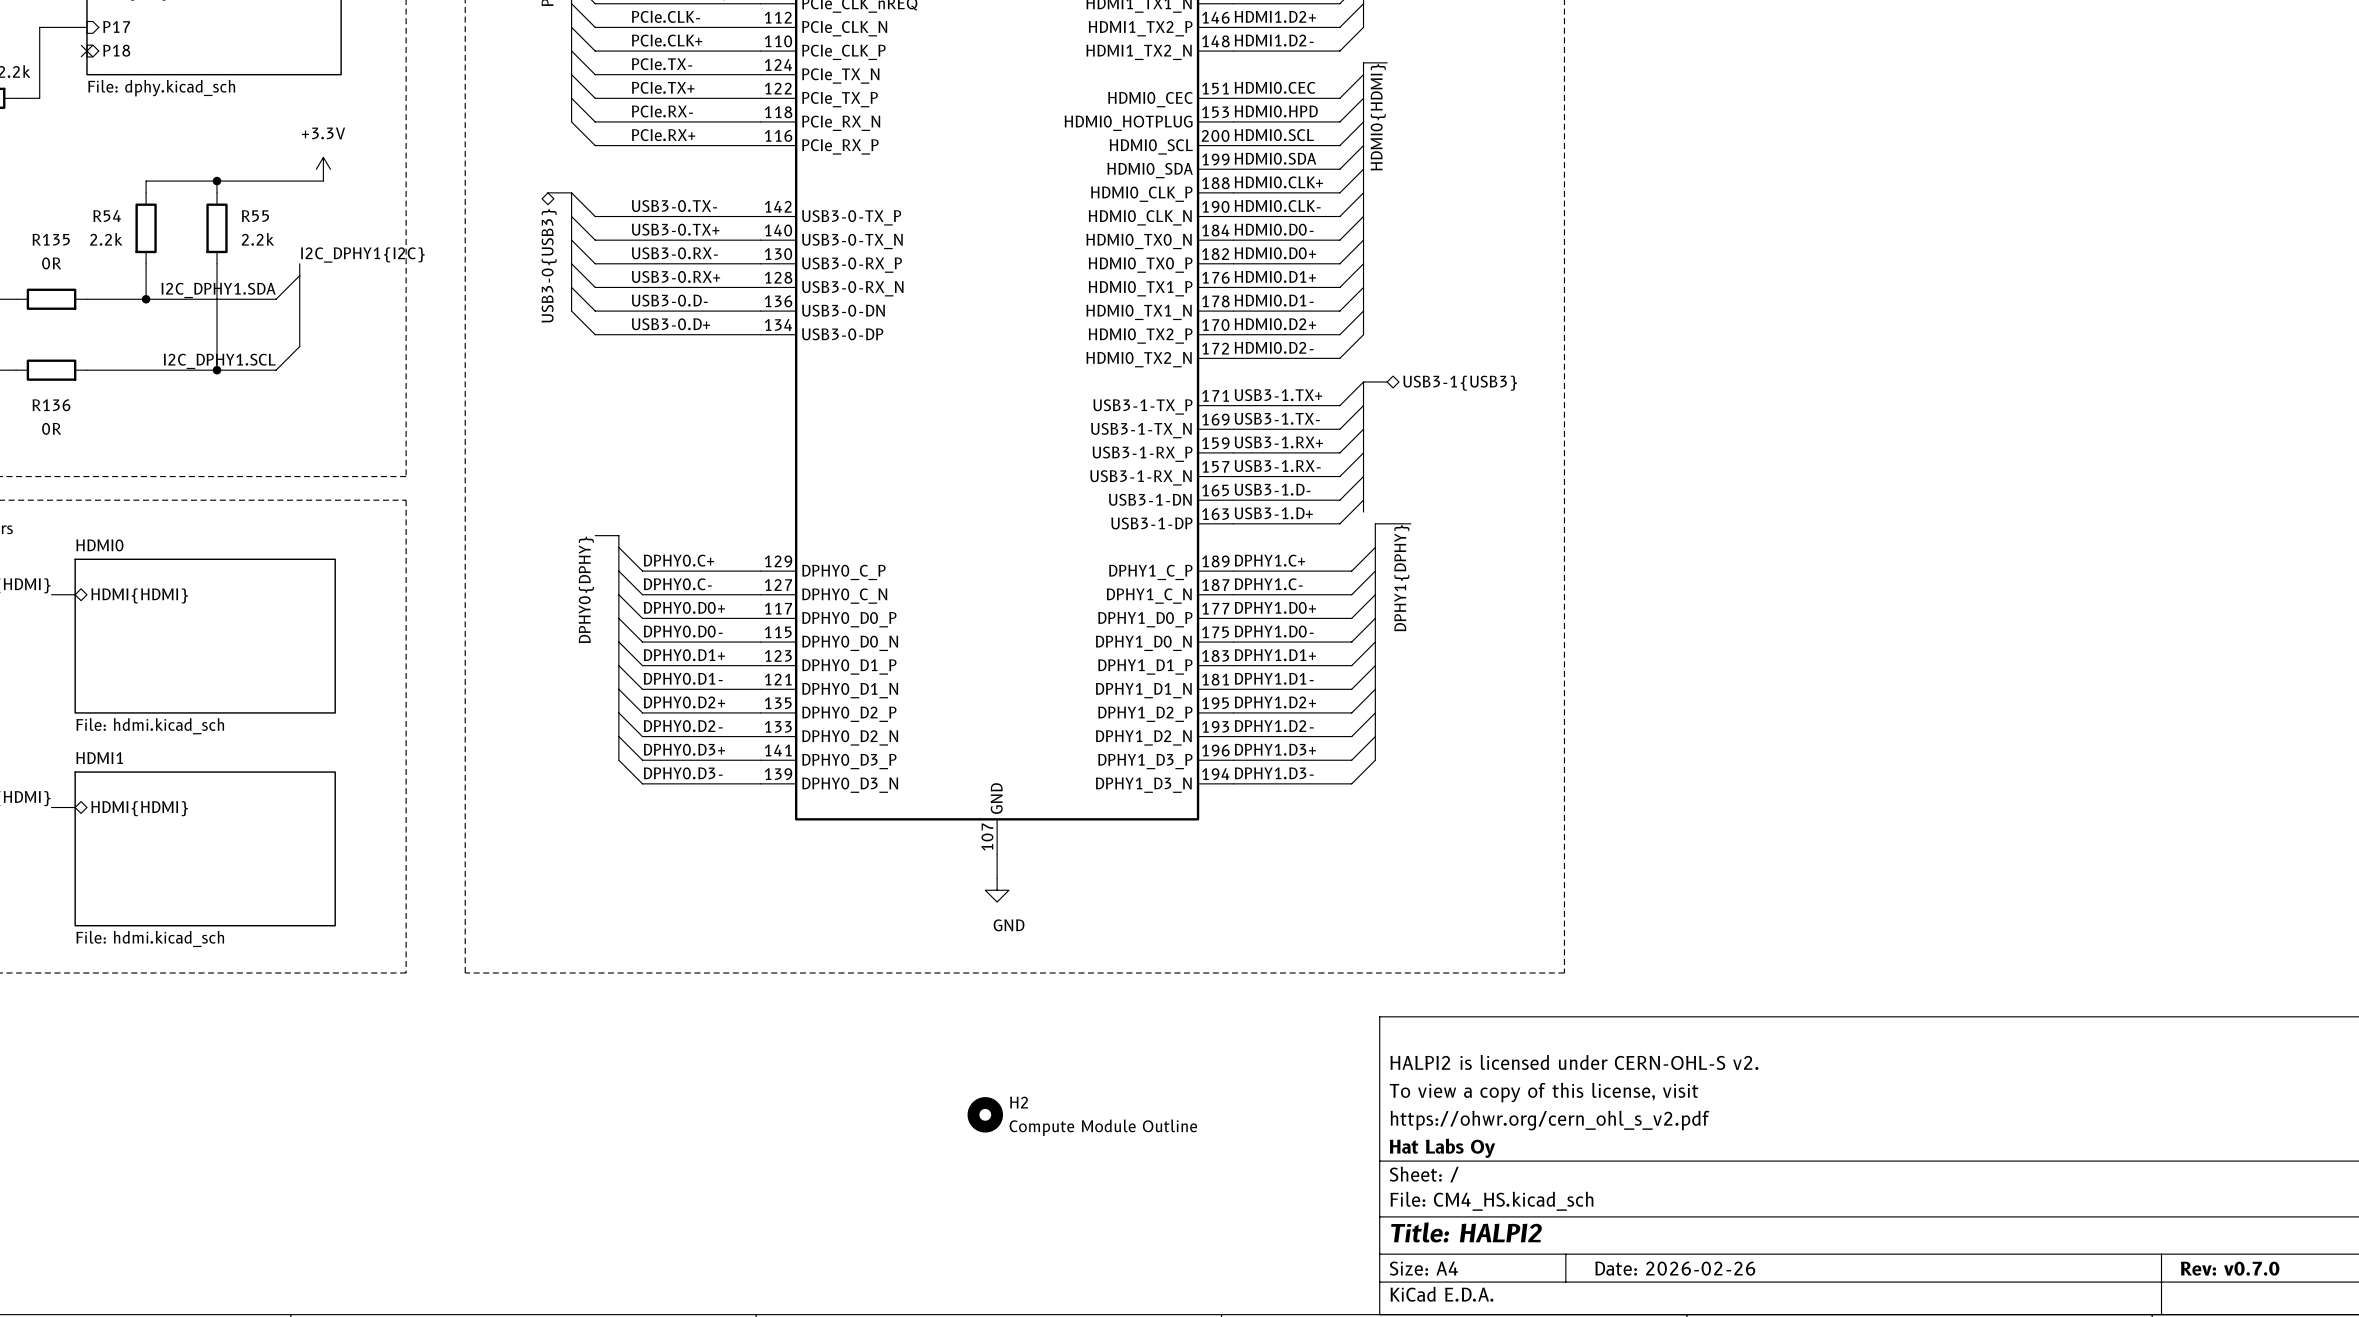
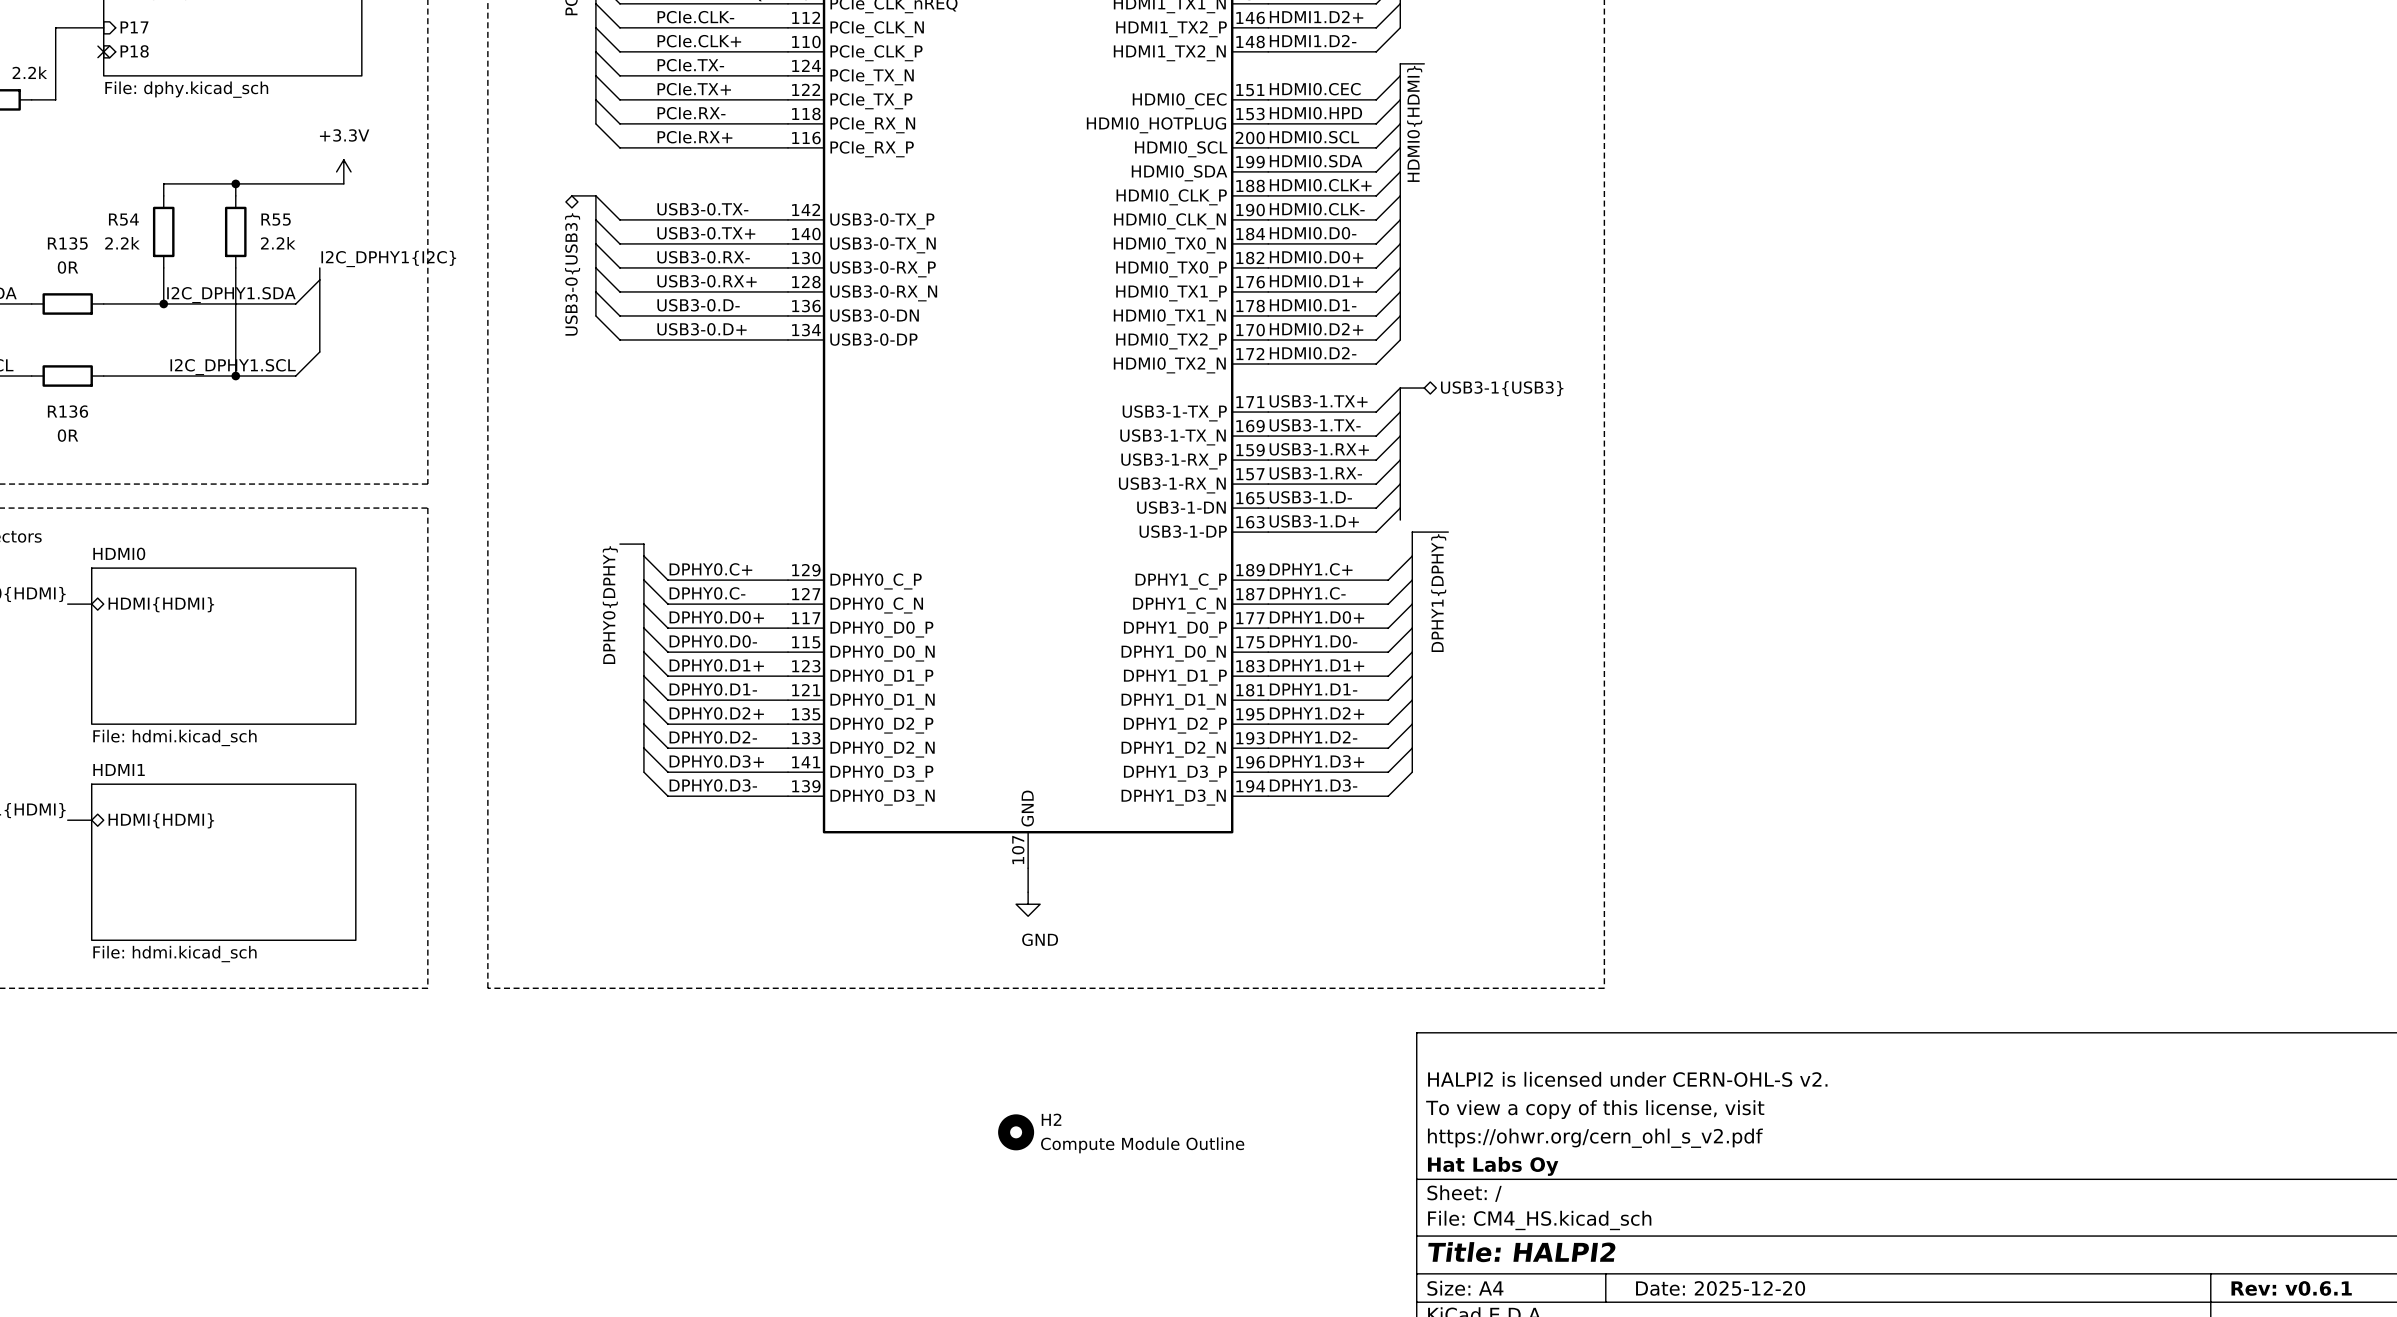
title block: Date: 2026-02-26 (1675, 1268) -> Date: 2025-12-20 (1720, 1288)
title block: Rev: v0.7.0 (2230, 1268) -> Rev: v0.6.1 (2291, 1288)

